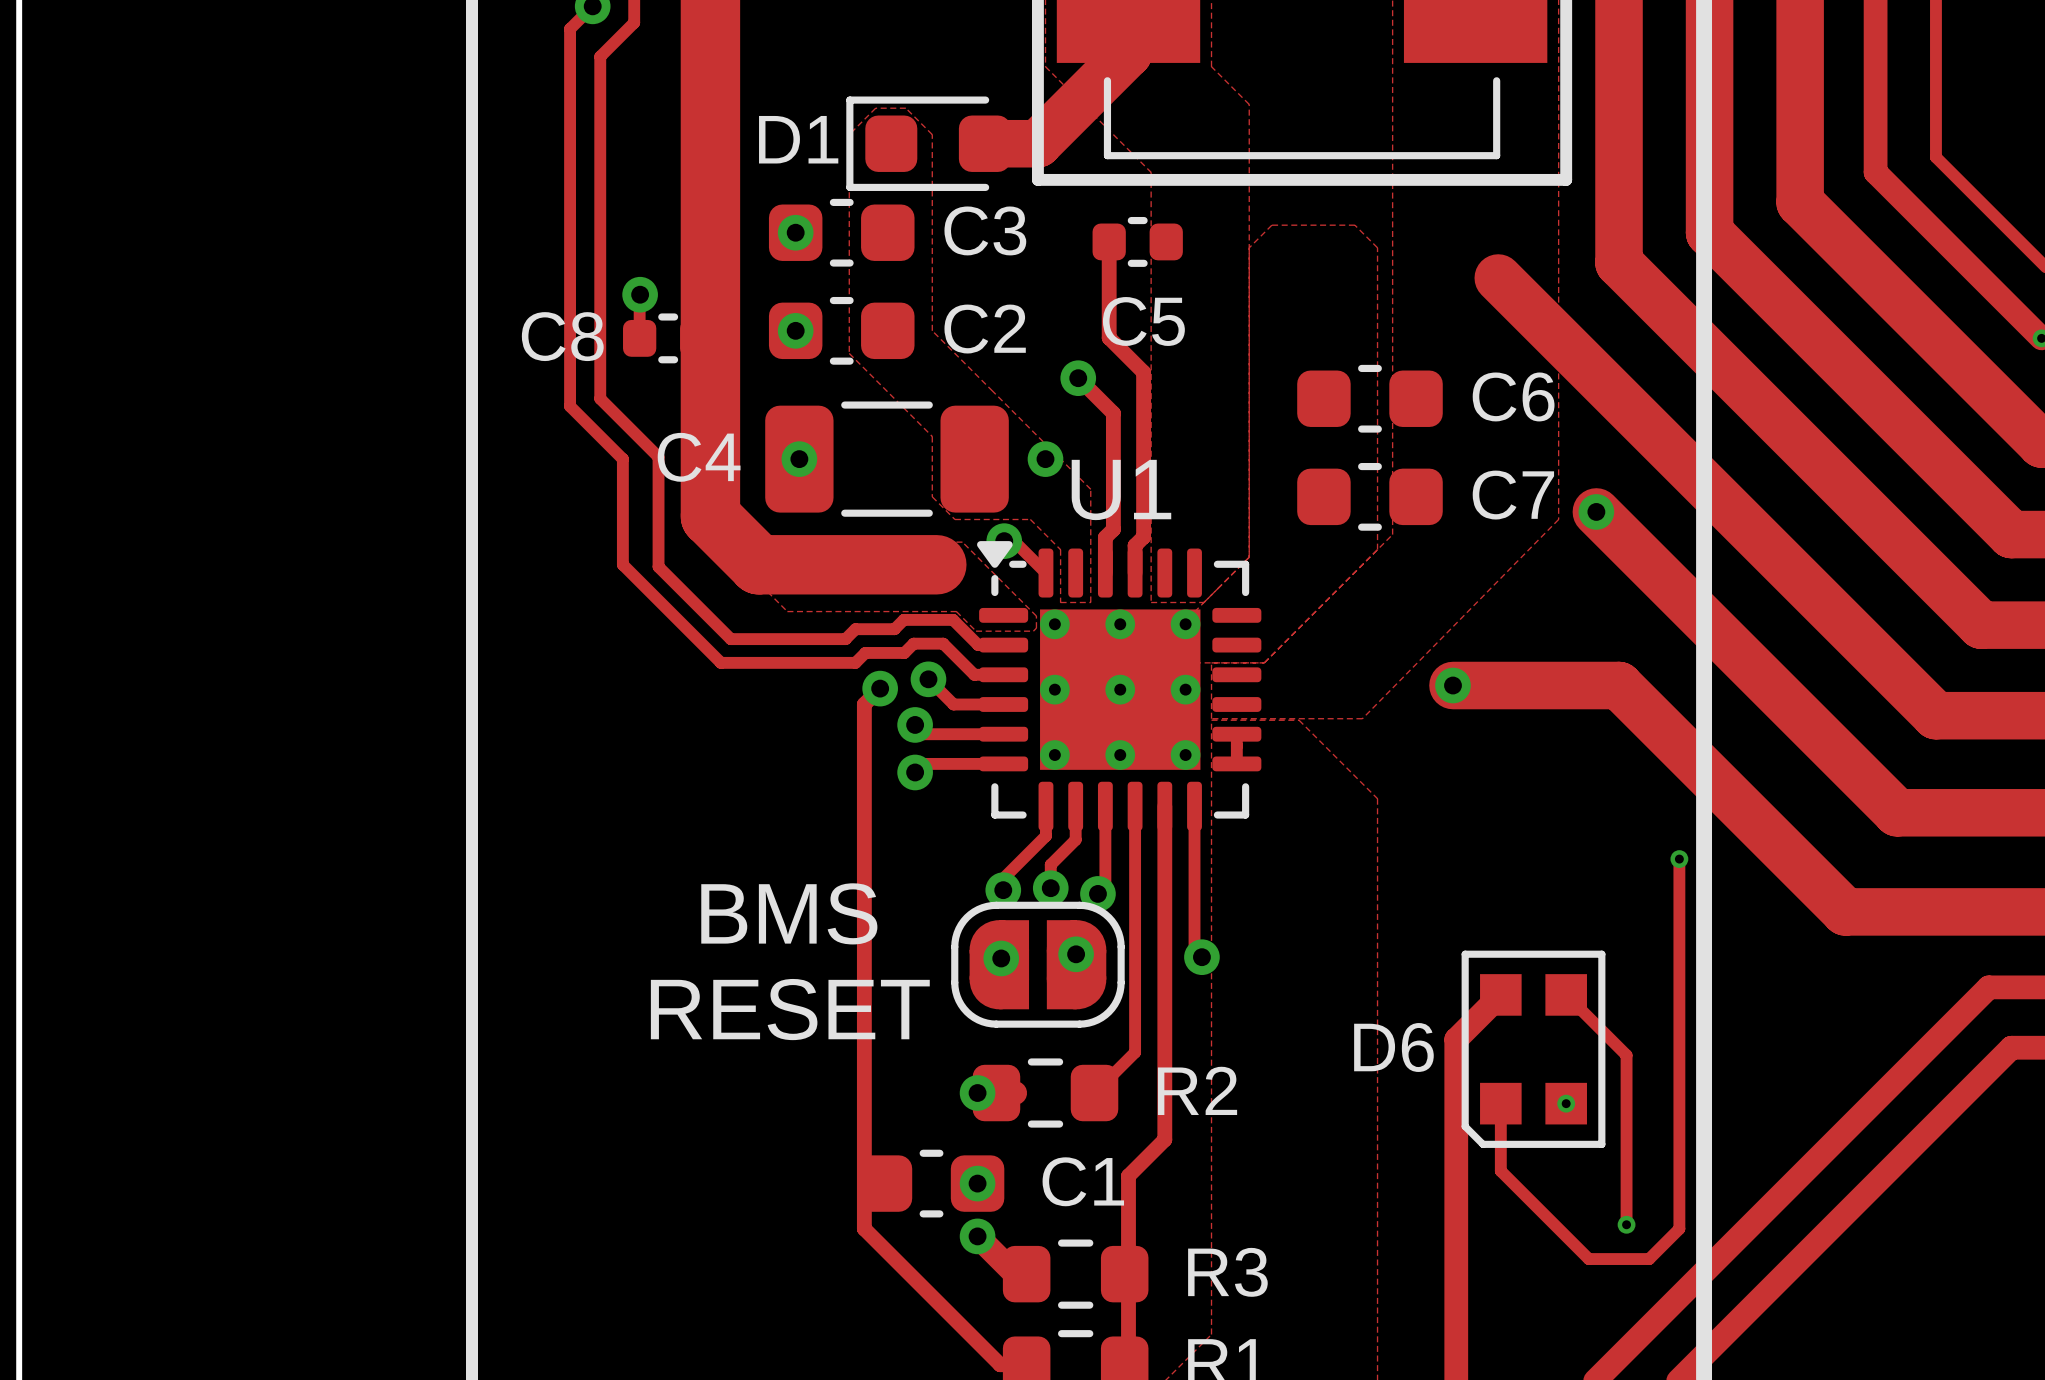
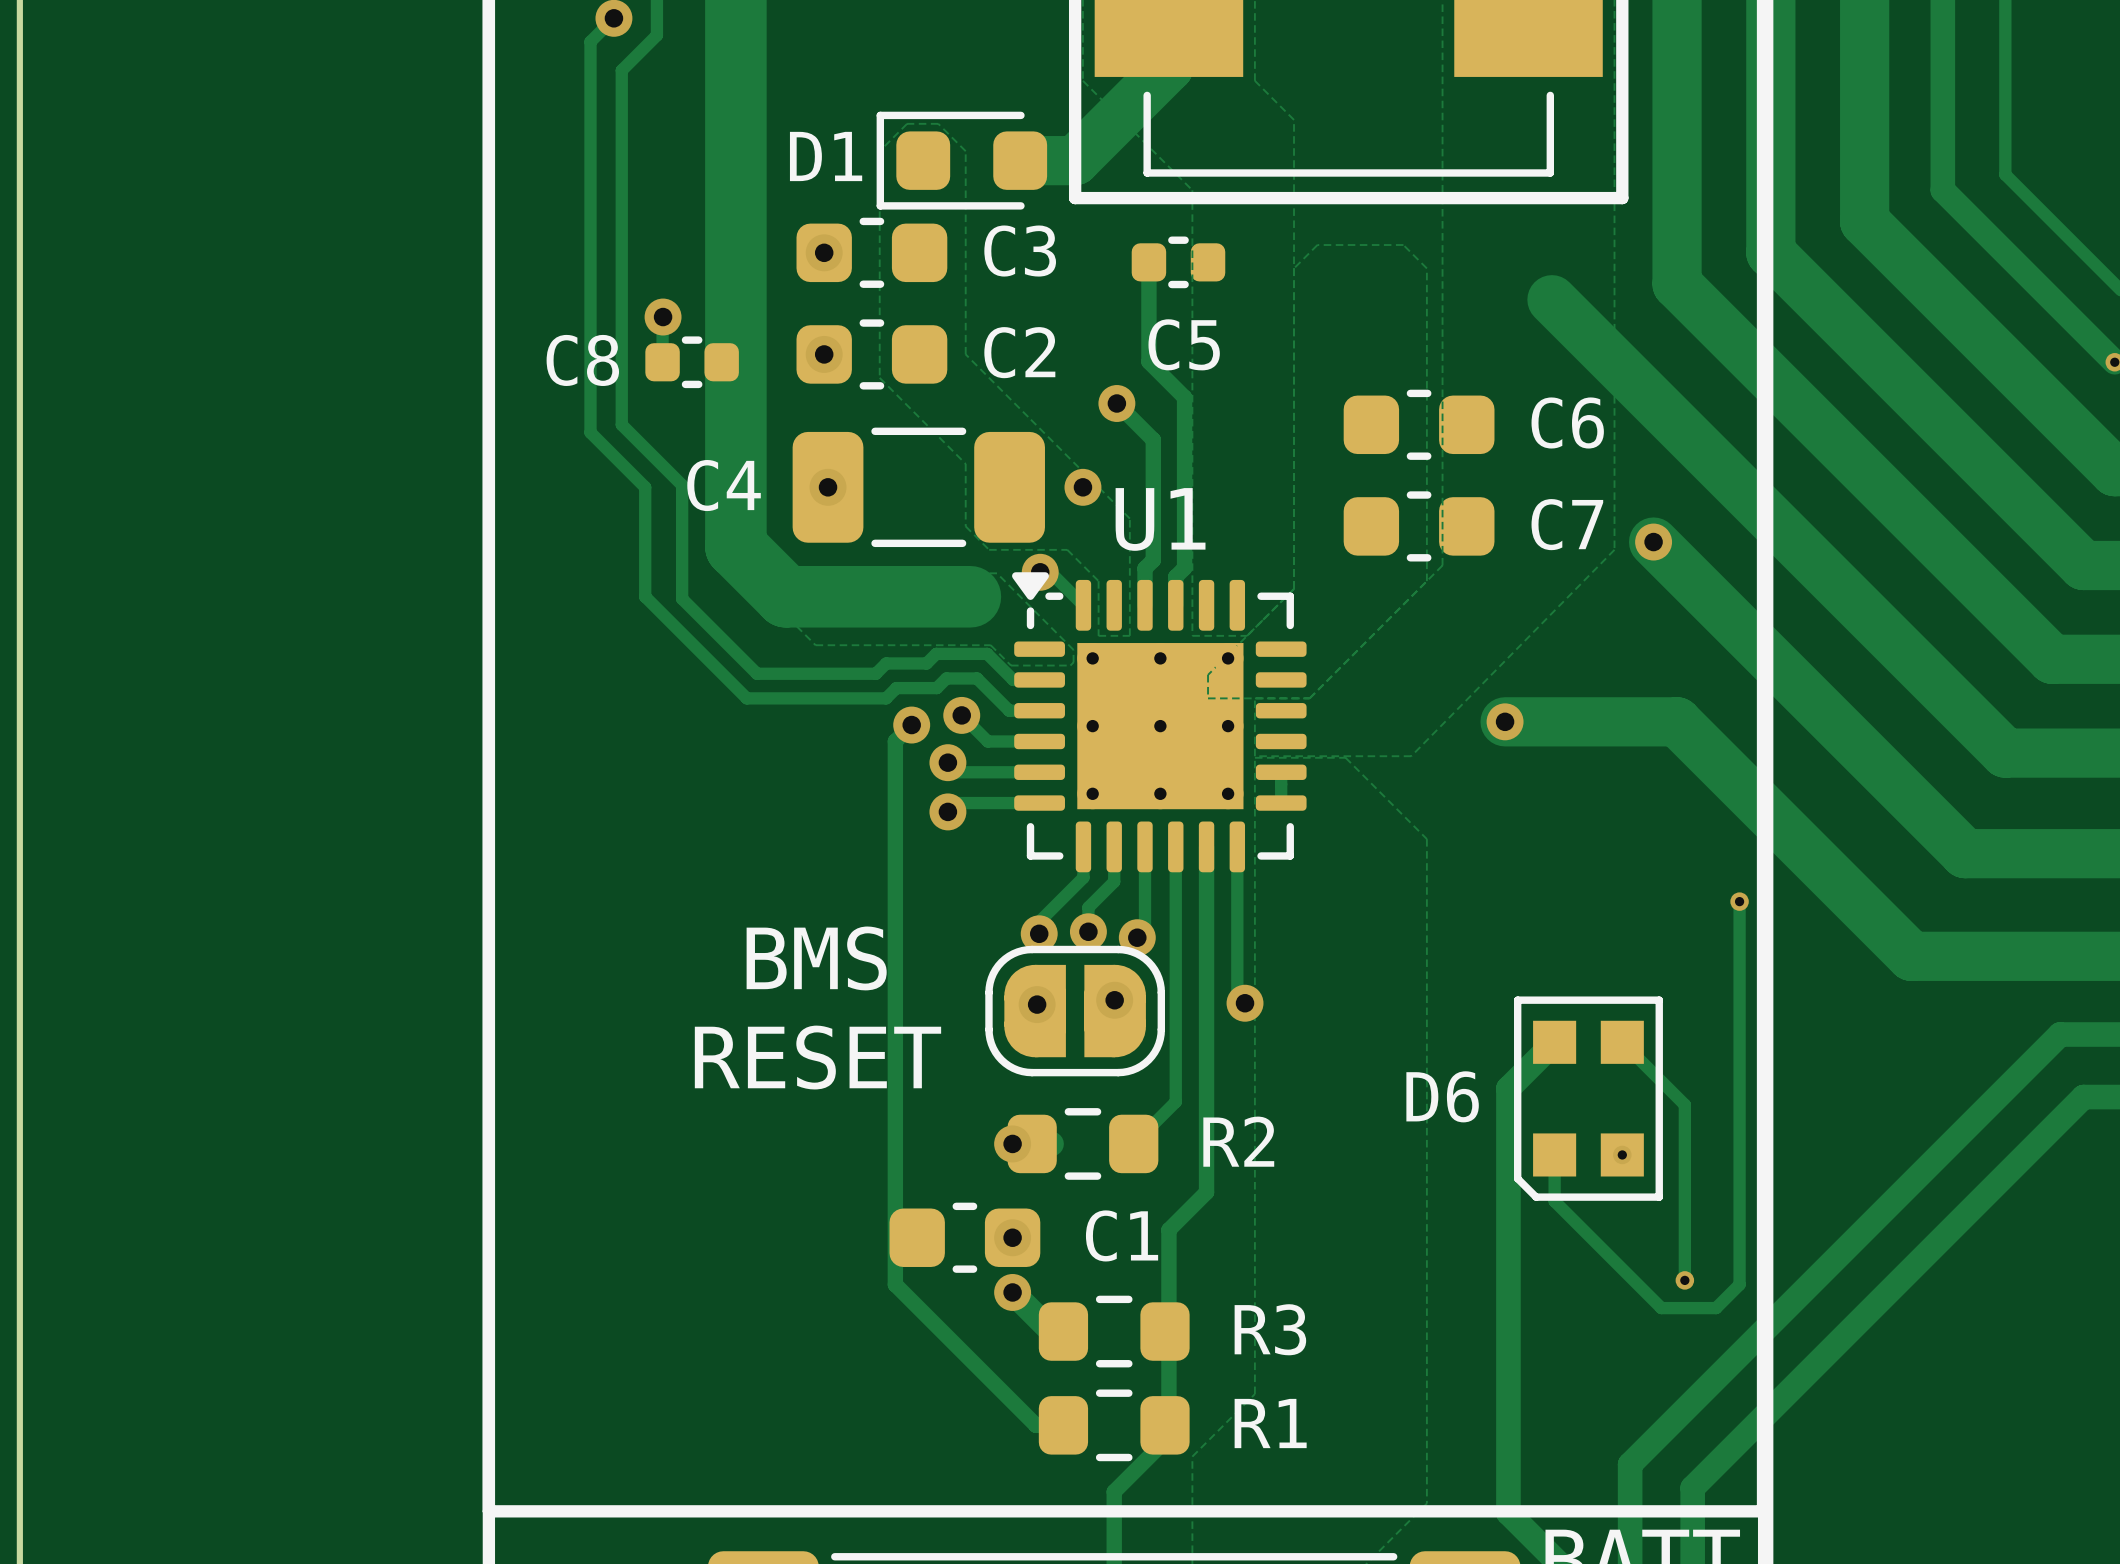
track: (1500, 1148) (1500, 1171) (1588, 1259) (1649, 1259) (1656, 1251) -> (1554, 1201) (1661, 1308) (1716, 1308)

